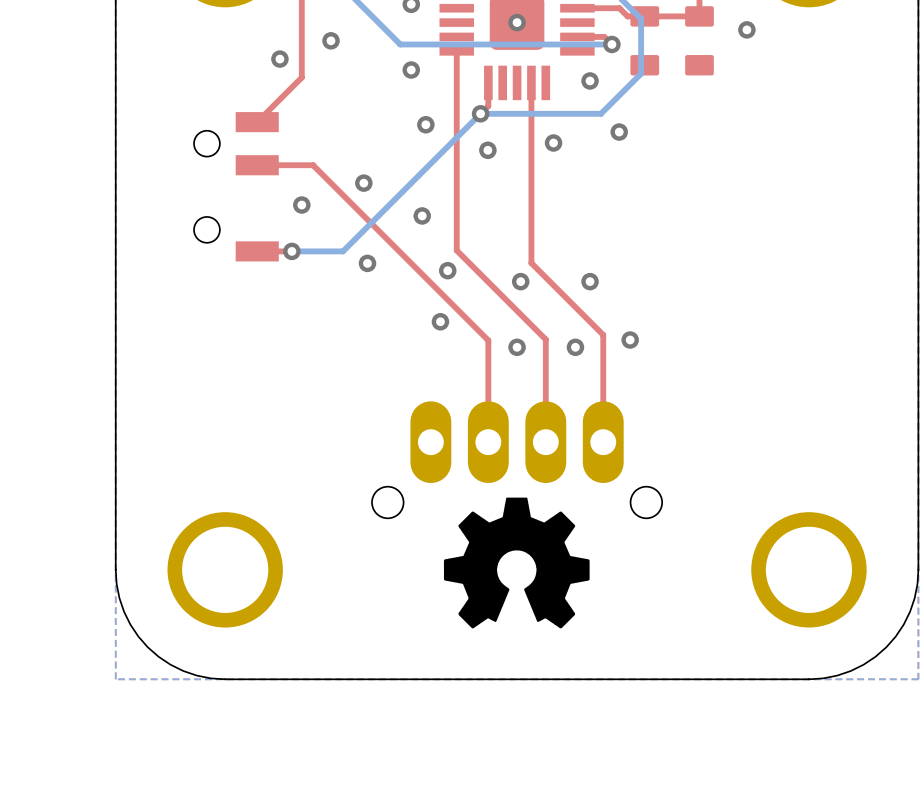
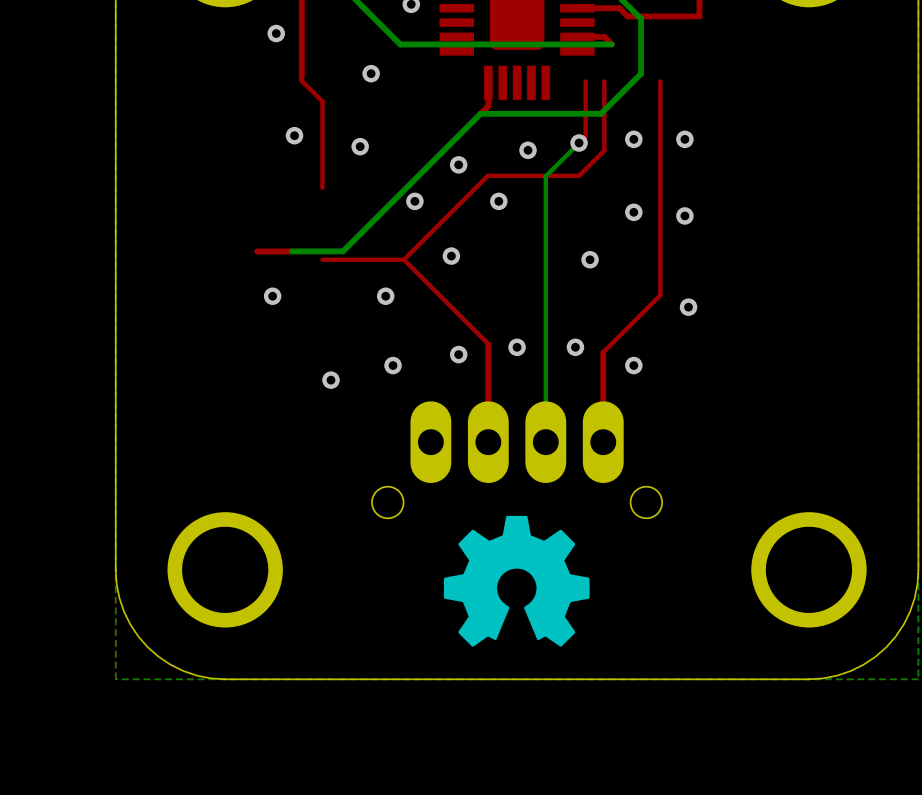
via: (517, 22) -> none
via: (746, 29) -> none
via: (331, 40) -> none
part: (644, 40) -> none
part: (699, 40) -> none
via: (611, 44) -> none
top track: (456, 51) (456, 250) (545, 339) (545, 442) -> none
via position: (279, 59) -> (276, 33)
via: (411, 70) -> none
via: none -> (371, 73)
top track: (301, 77) (257, 122) -> (301, 77) (301, 80) (322, 101) (322, 187)
via: (590, 80) -> none
top track: none -> (585, 81) (585, 136) (579, 142)
top track: none -> (604, 81) (604, 150) (579, 175) (487, 175) (403, 259)
top track: (531, 82) (531, 263) (603, 334) (603, 352) -> (660, 81) (660, 295) (603, 352)
via: (480, 113) -> none
via: (425, 124) -> none
via position: (619, 132) -> (633, 139)
via: none -> (294, 135)
via: none -> (684, 139)
via: (553, 142) -> none
bottom track: none -> (579, 142) (545, 176) (545, 442)
via: none -> (579, 142)
via: none -> (360, 146)
via: (487, 150) -> none
via: none -> (528, 150)
via: none -> (458, 164)
top track: (257, 165) (313, 165) (488, 340) (488, 344) -> (403, 259) (488, 344)
via: (363, 183) -> none
part: (236, 186) -> none
via: none -> (498, 201)
via: (301, 205) -> none
via: none -> (633, 212)
via position: (422, 215) -> (414, 201)
via: none -> (684, 215)
via: (291, 251) -> none
top track: none -> (403, 259) (322, 259)
via: (367, 263) -> none
via position: (447, 270) -> (451, 256)
via: (520, 281) -> none
via position: (590, 281) -> (590, 259)
via: none -> (272, 296)
via: none -> (385, 296)
via: none -> (688, 307)
via: (440, 321) -> none
via position: (630, 340) -> (633, 365)
via: none -> (458, 354)
via: none -> (393, 365)
via: none -> (331, 380)
drawing position: (516, 563) -> (516, 581)

